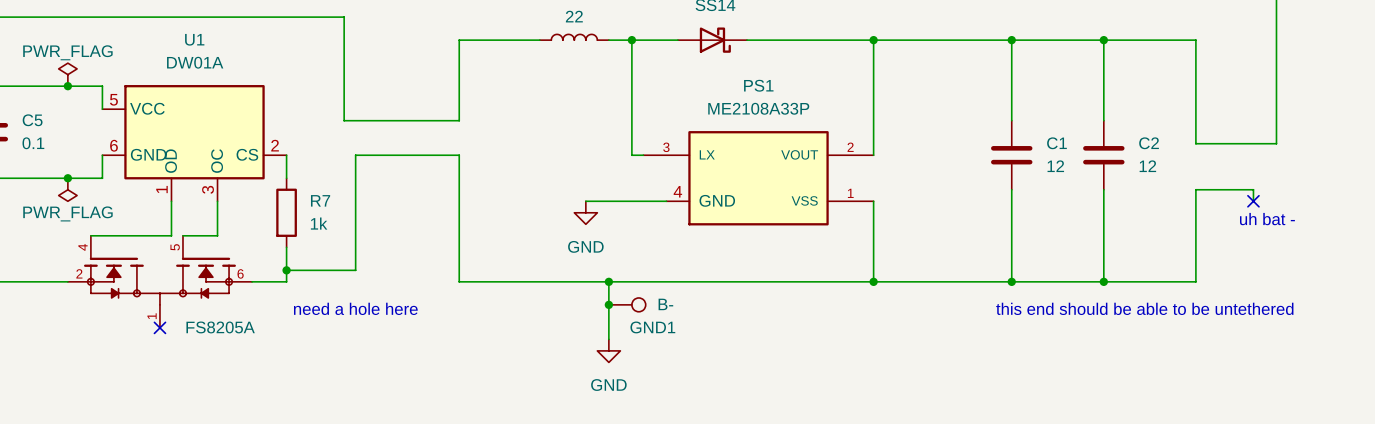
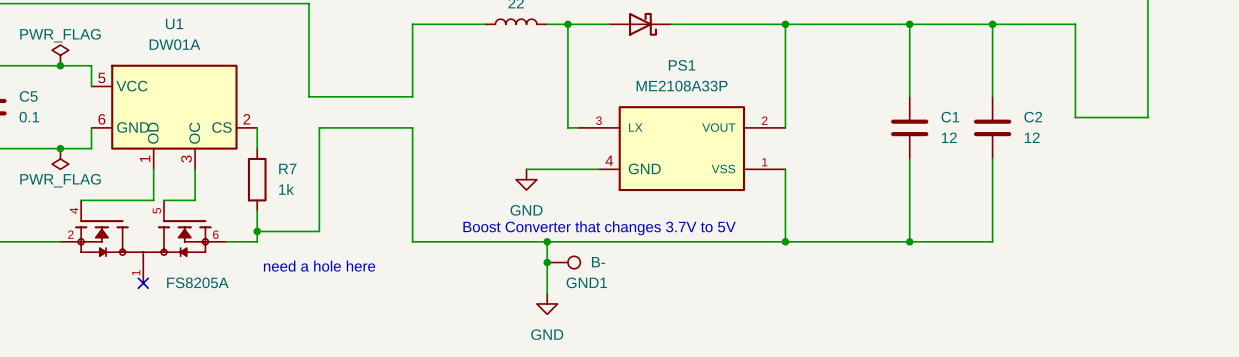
wire: (1253, 201) (1253, 189) (1195, 189) (1195, 281) (1103, 281) -> none
no-connect mark: (1253, 201) -> none
text: uh bat - (1267, 219) -> none
text: none -> Boost Converter that changes 3.7V to 5V (599, 228)
junction: (1103, 281) -> none
text: this end should be able to be untethered (1144, 308) -> none

